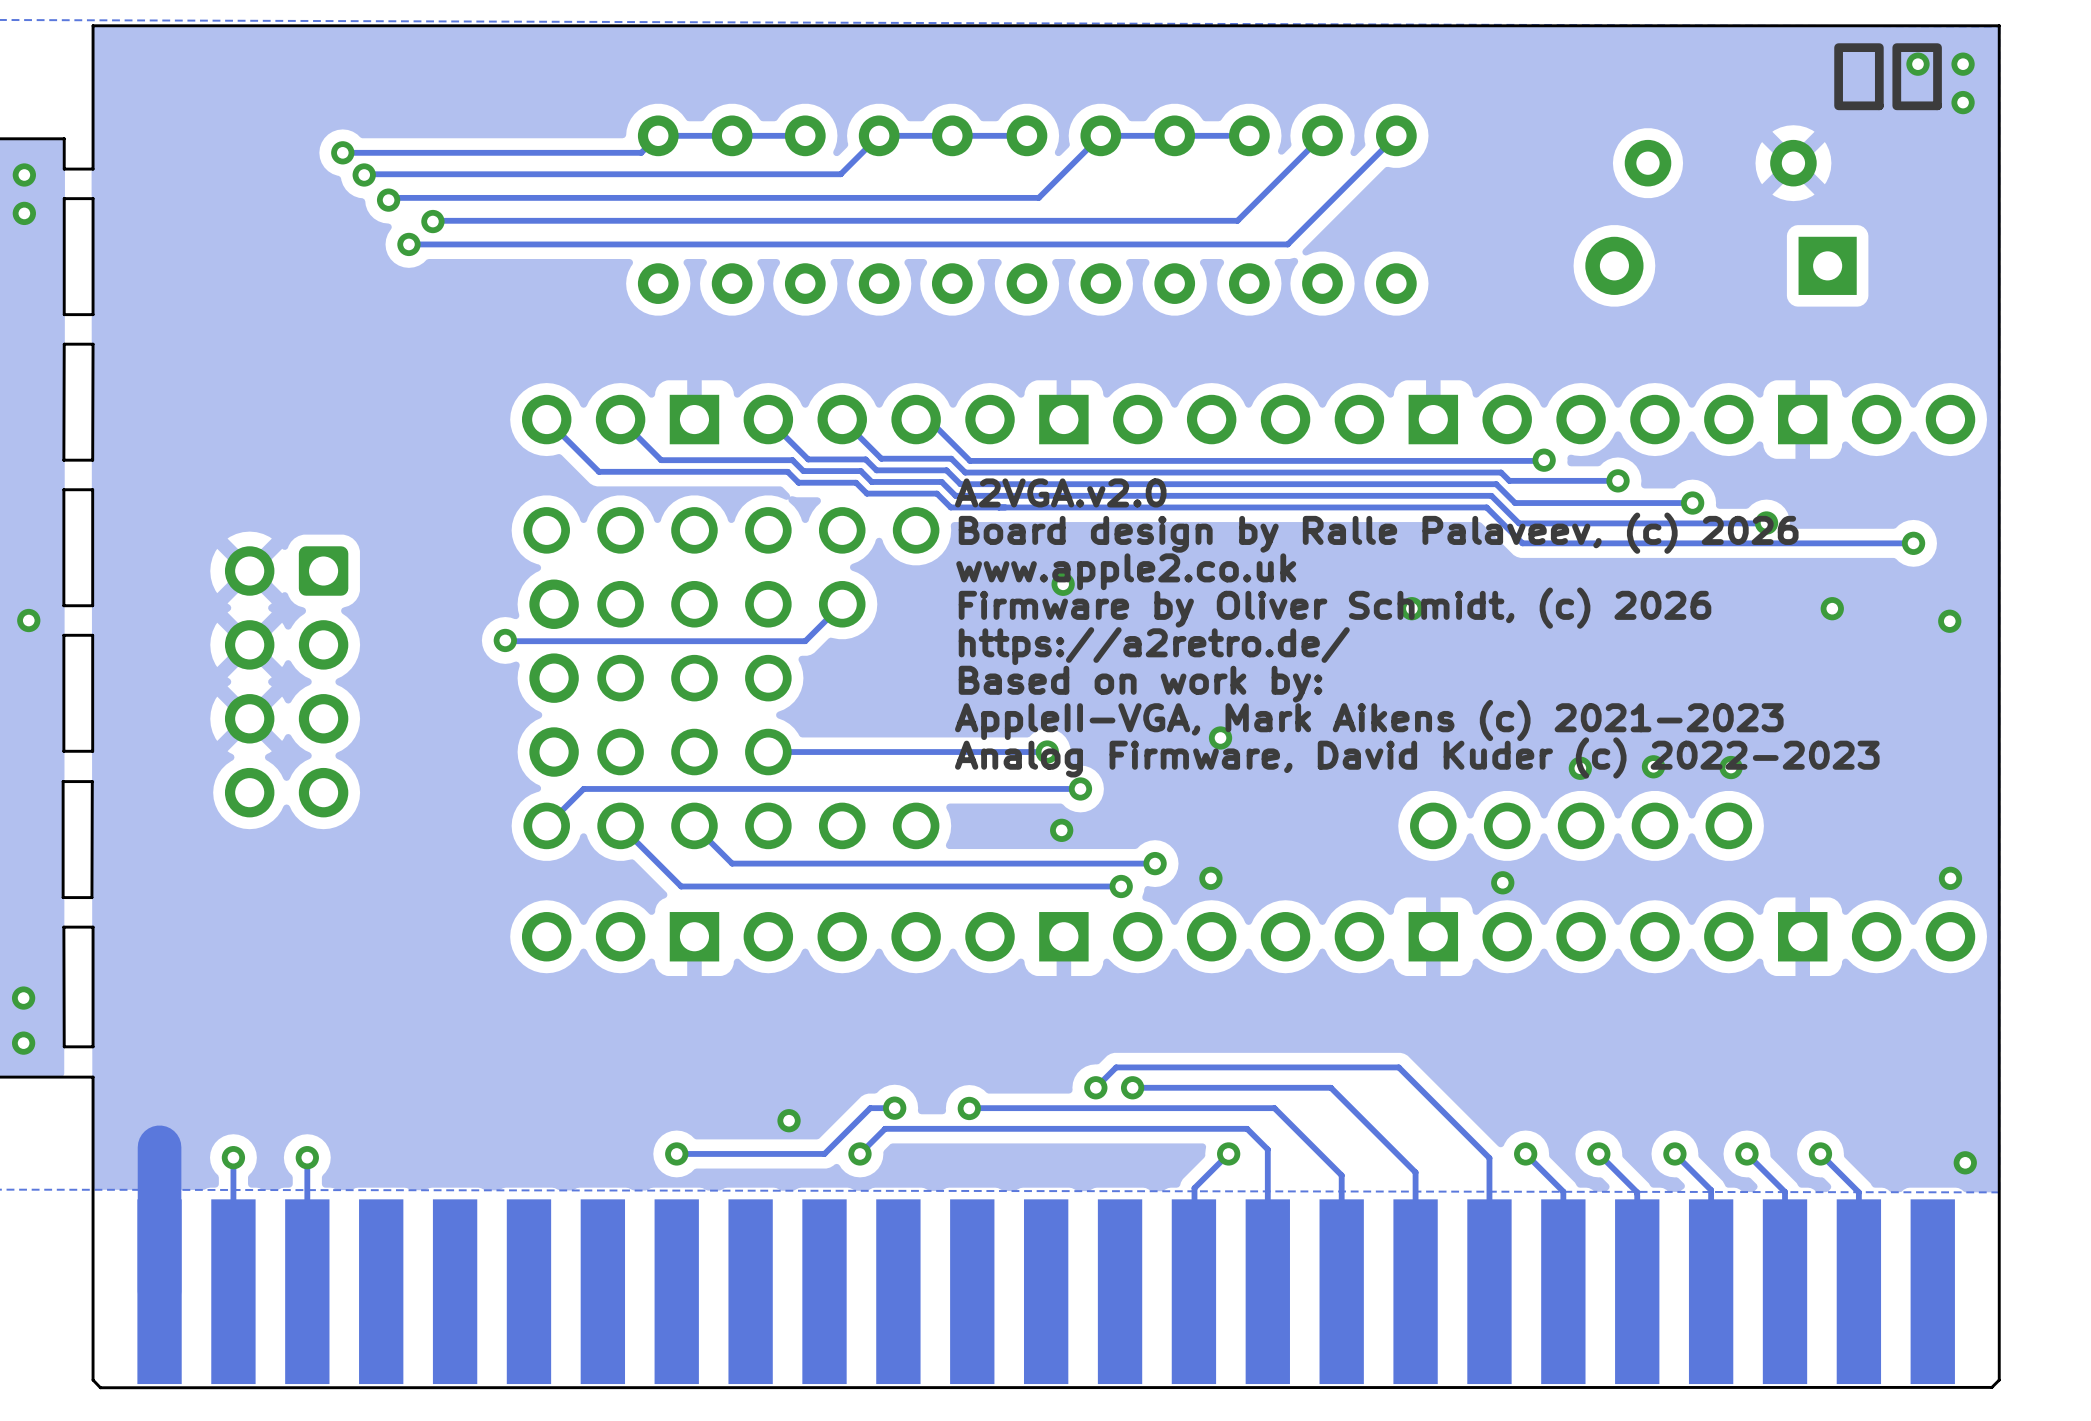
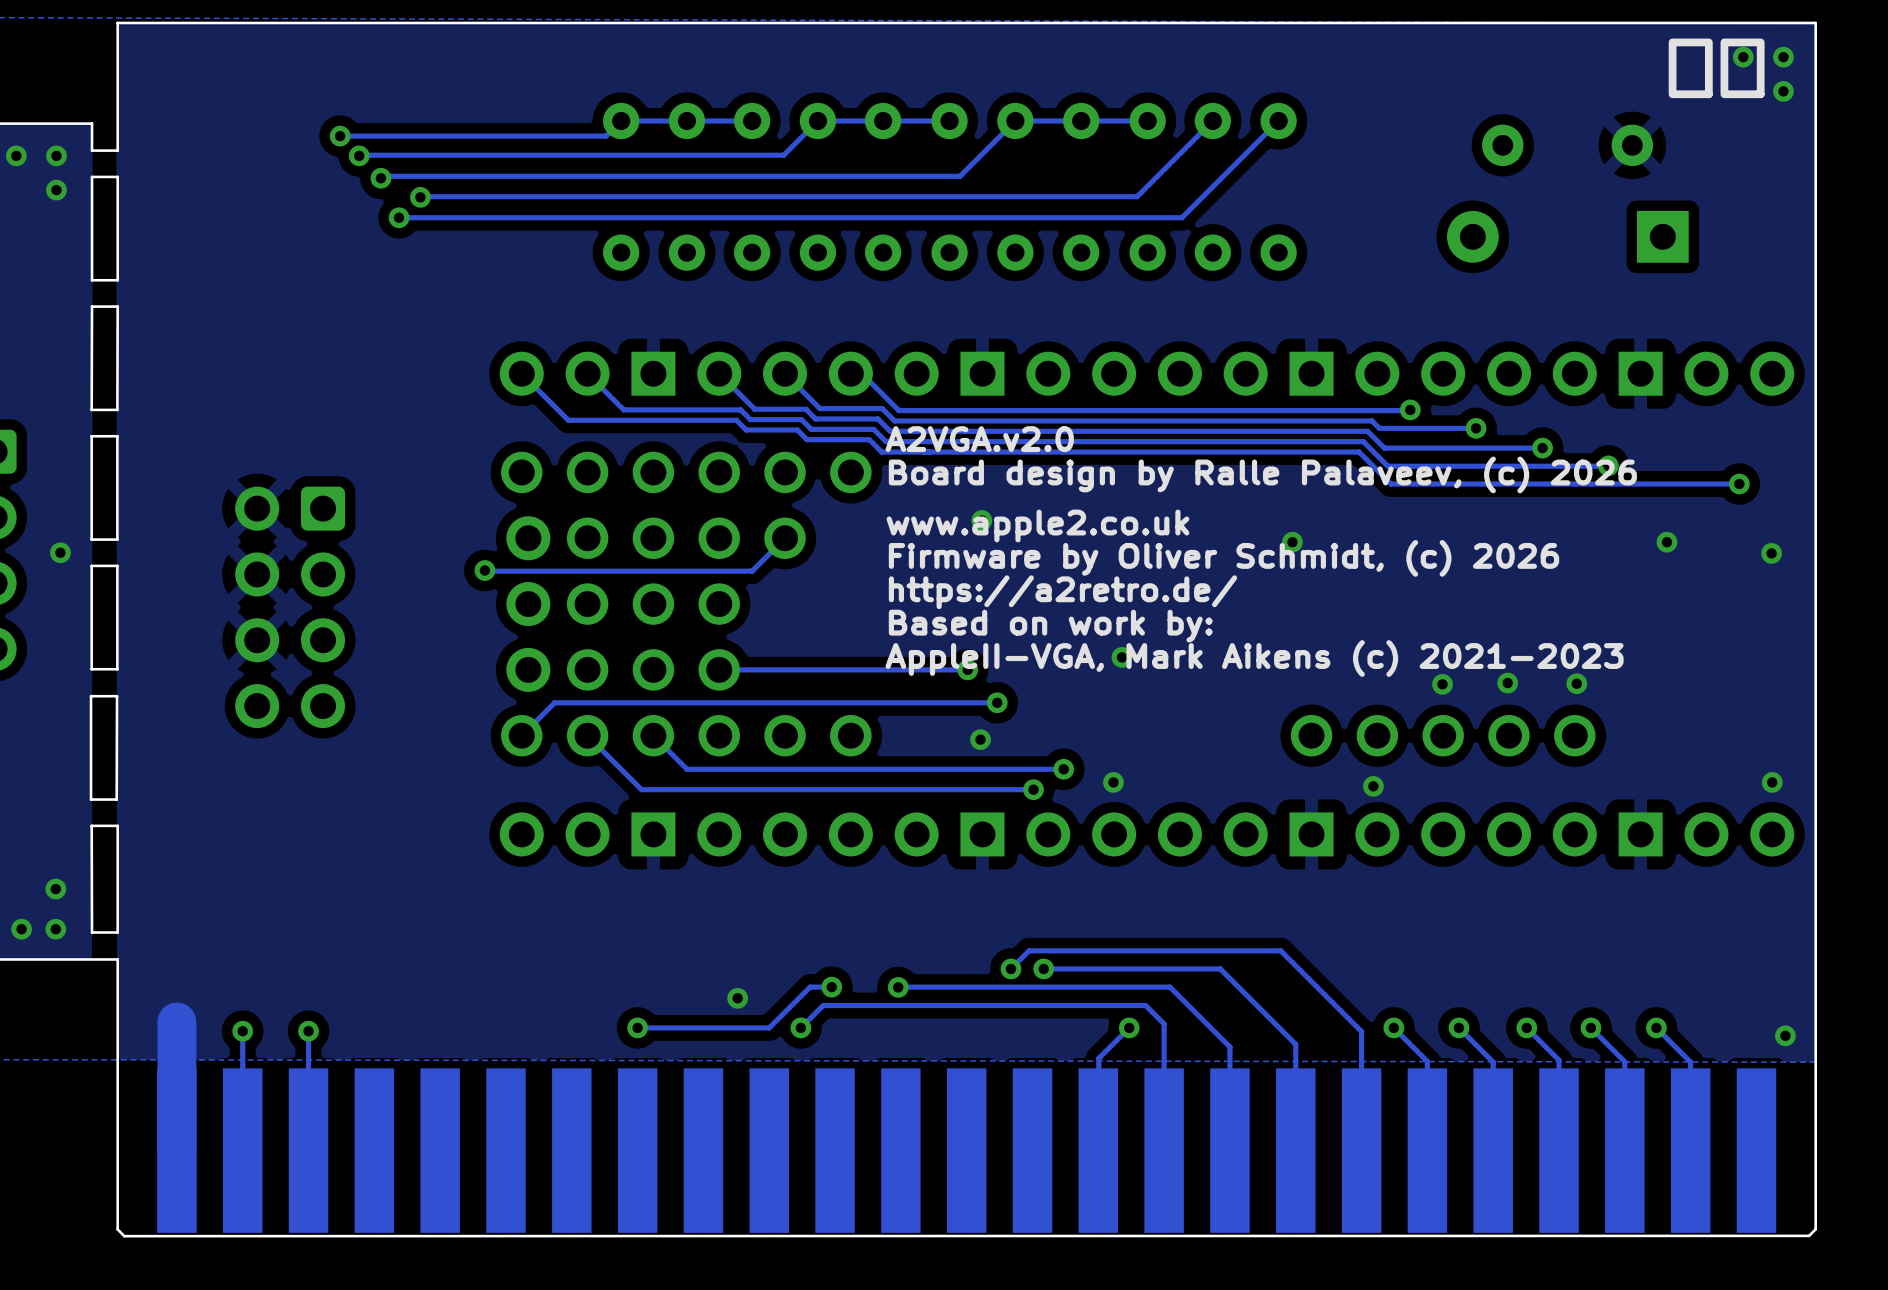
text position: www.apple2.co.uk (1126, 571) -> www.apple2.co.uk (1037, 525)
text position: Firmware by Oliver Schmidt, (c) 2026 (1335, 608) -> Firmware by Oliver Schmidt, (c) 2026 (1224, 558)
text position: https://a2retro.de/ (1154, 646) -> https://a2retro.de/ (1062, 592)
text position: Based on work by: (1140, 684) -> Based on work by: (1050, 626)
text position: AppleII-VGA, Mark Aikens (c) 2021-2023 (1369, 720) -> AppleII-VGA, Mark Aikens (c) 2021-2023 (1254, 658)
text: Analog Firmware, David Kuder (c) 2022-2023 (1417, 757) -> none

